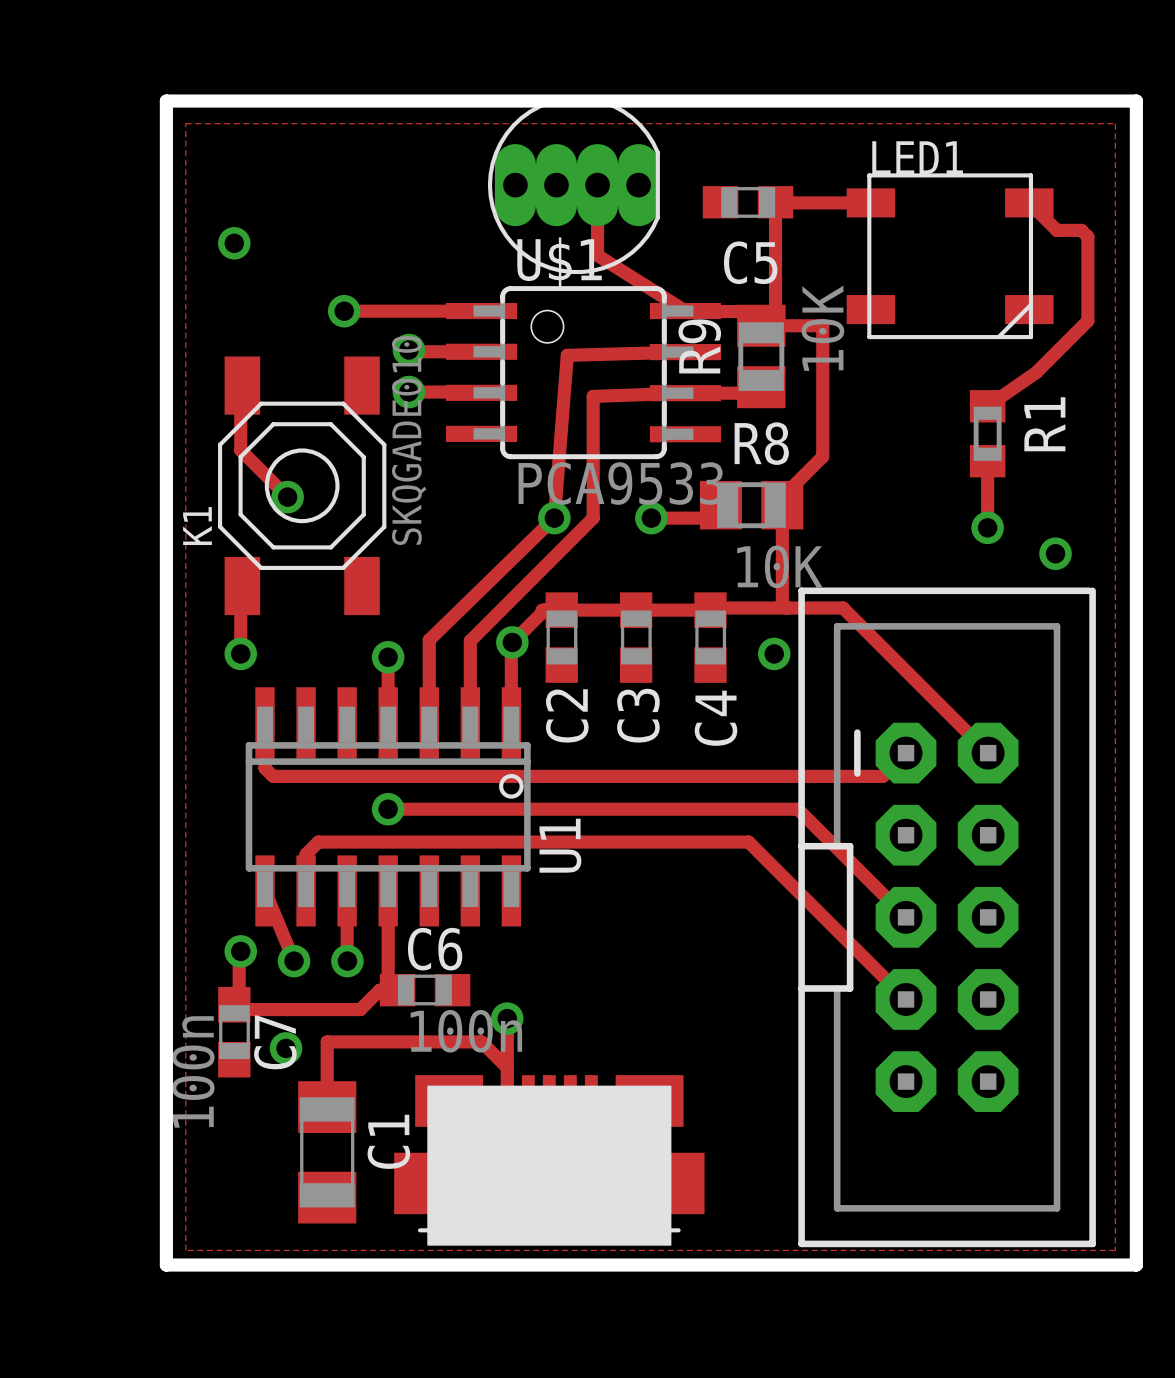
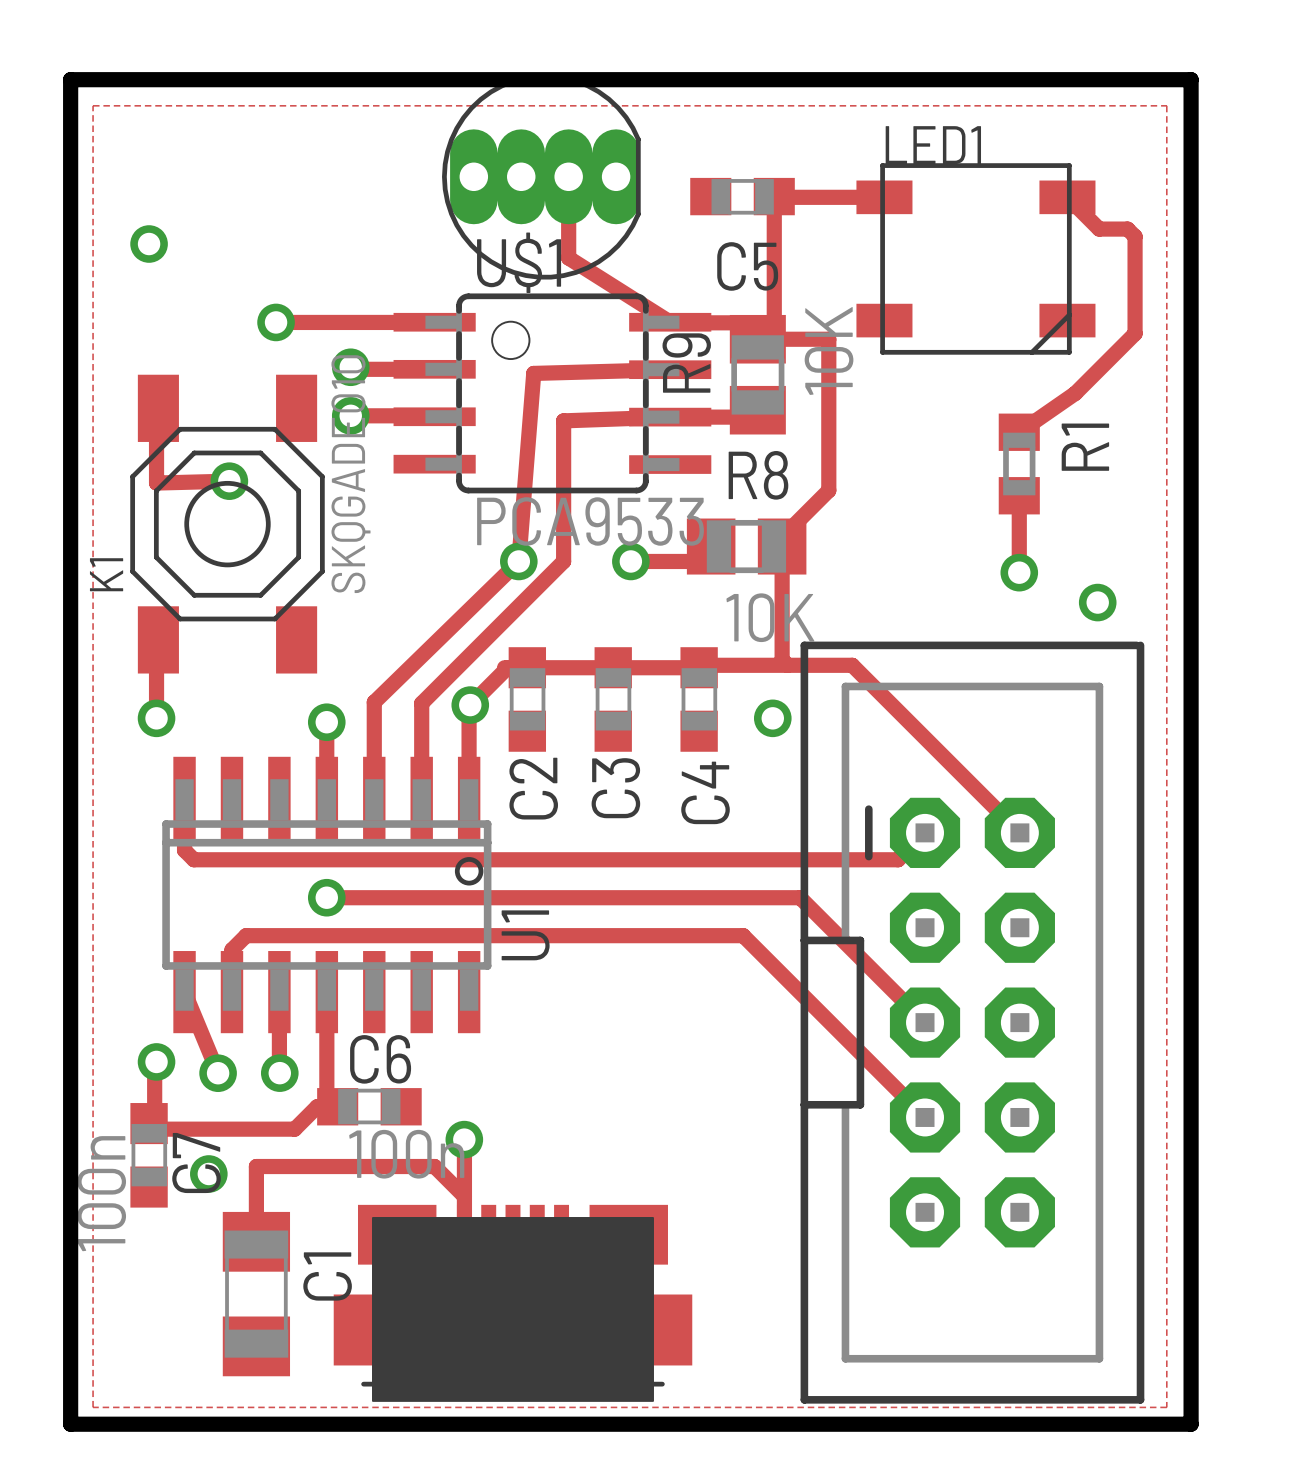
track: (240, 450) (287, 497) -> (156, 483) (229, 481)
via position: (287, 497) -> (229, 481)

